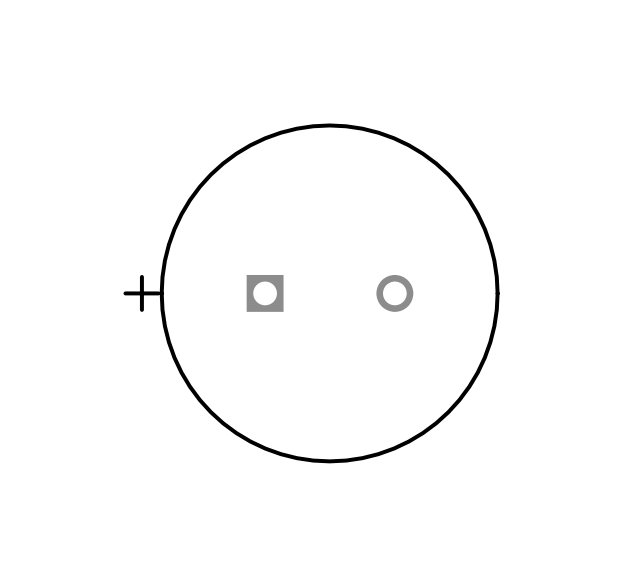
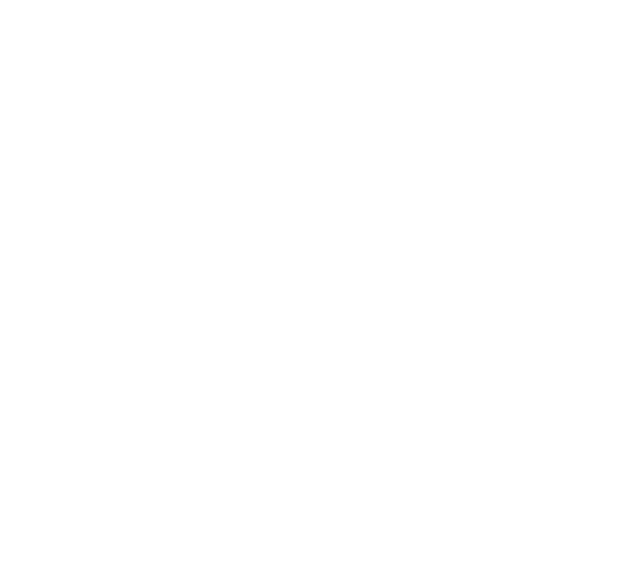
part: (311, 293) -> none

